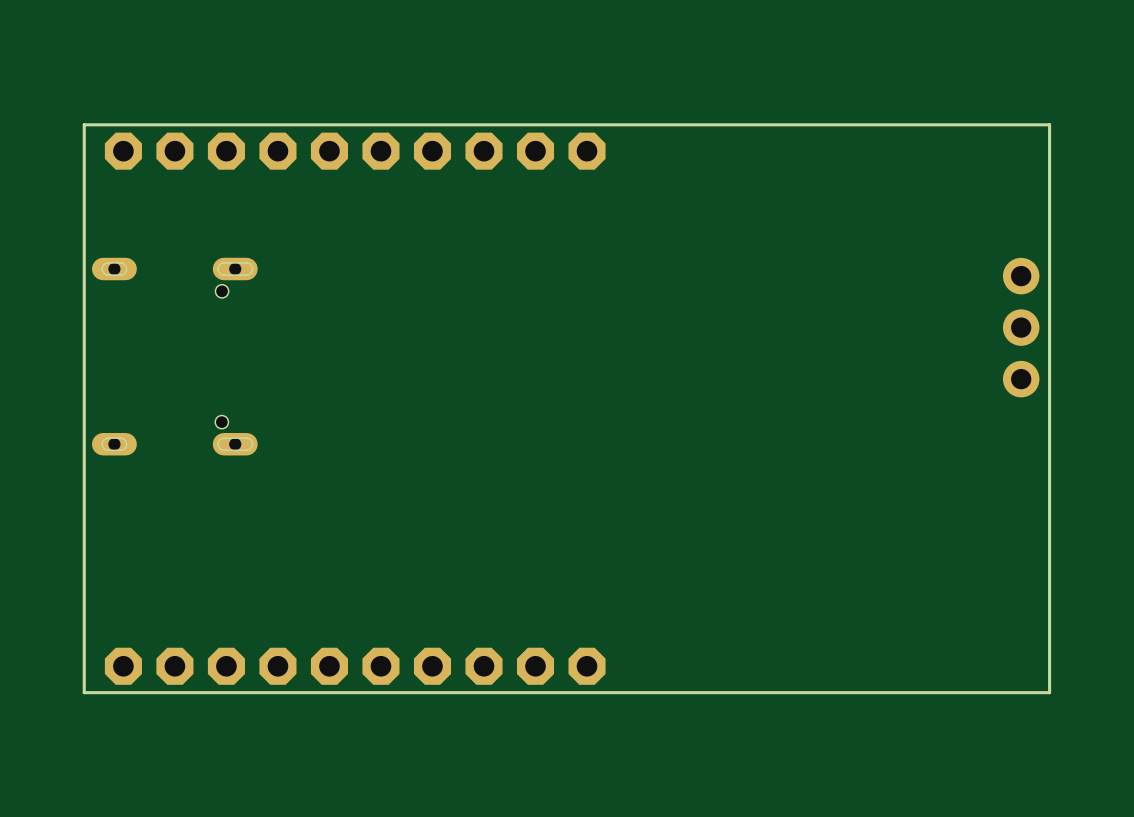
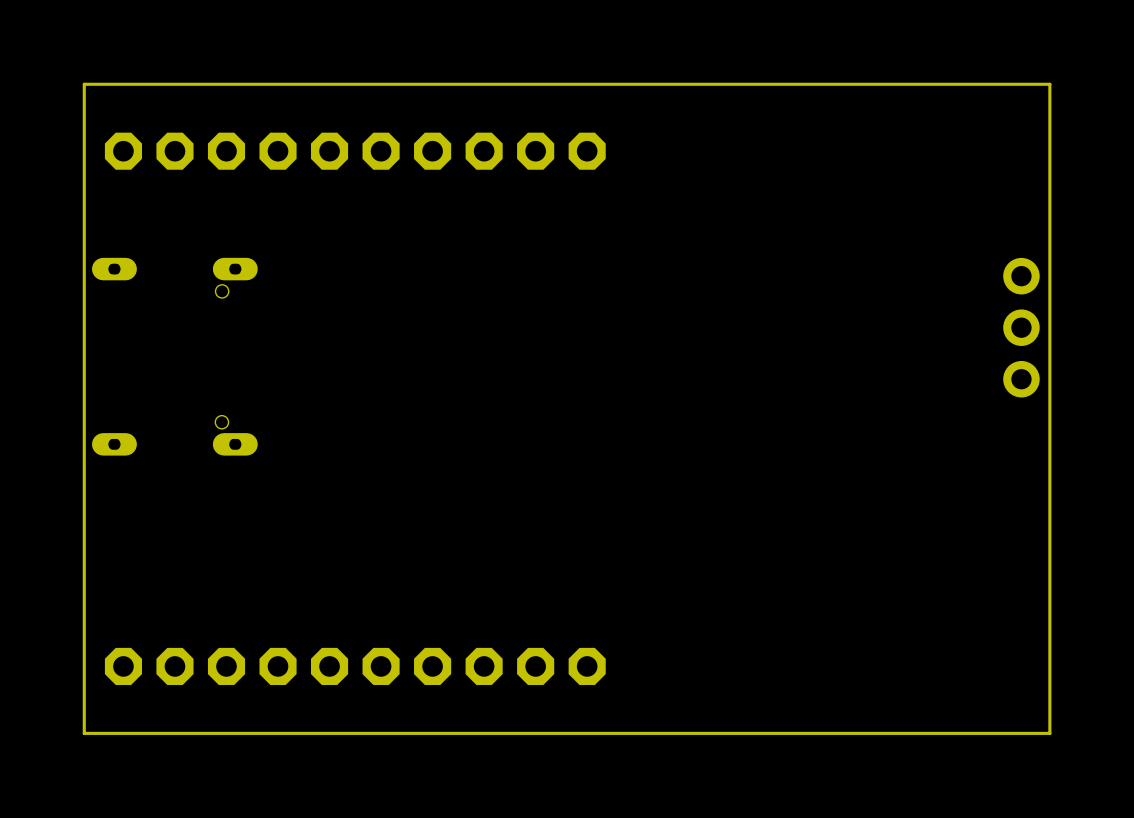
board edge: (1049, 124) (84, 124) -> (1049, 124) (1049, 84) (84, 84) (84, 124)
board edge: (1049, 692) (84, 692) -> (1049, 692) (1049, 733) (84, 733) (84, 692)

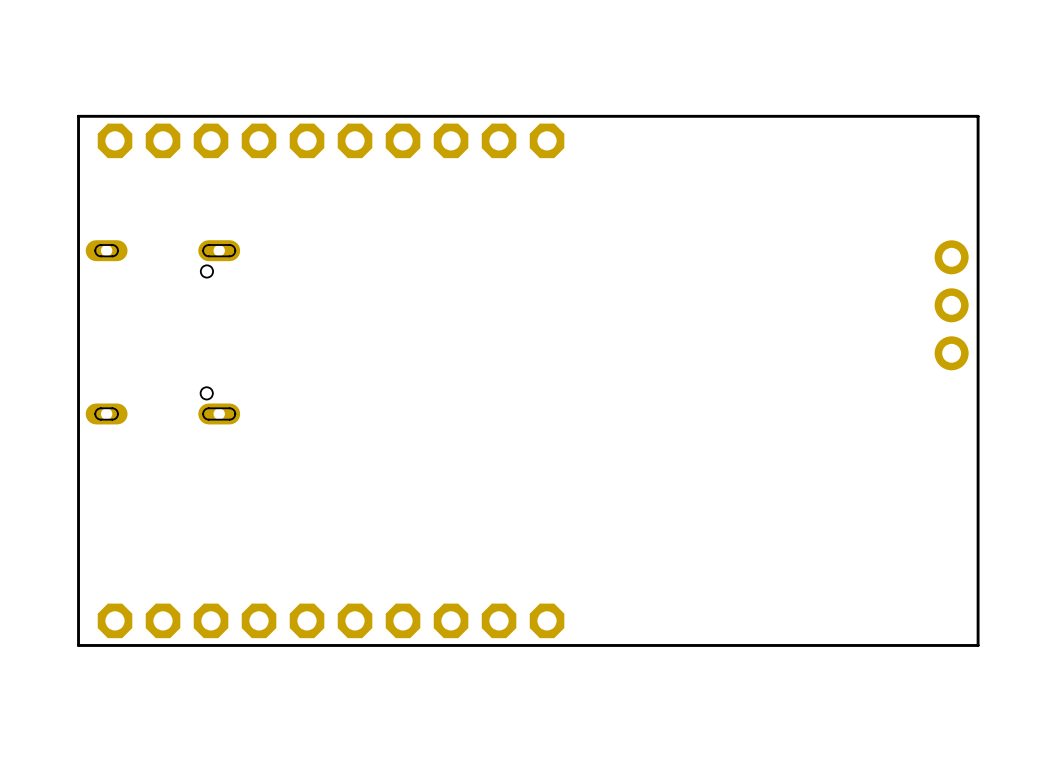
board edge: (1049, 124) (1049, 84) (84, 84) (84, 124) -> (978, 116) (78, 116)
board edge: (1049, 692) (1049, 733) (84, 733) (84, 692) -> (978, 645) (78, 645)

